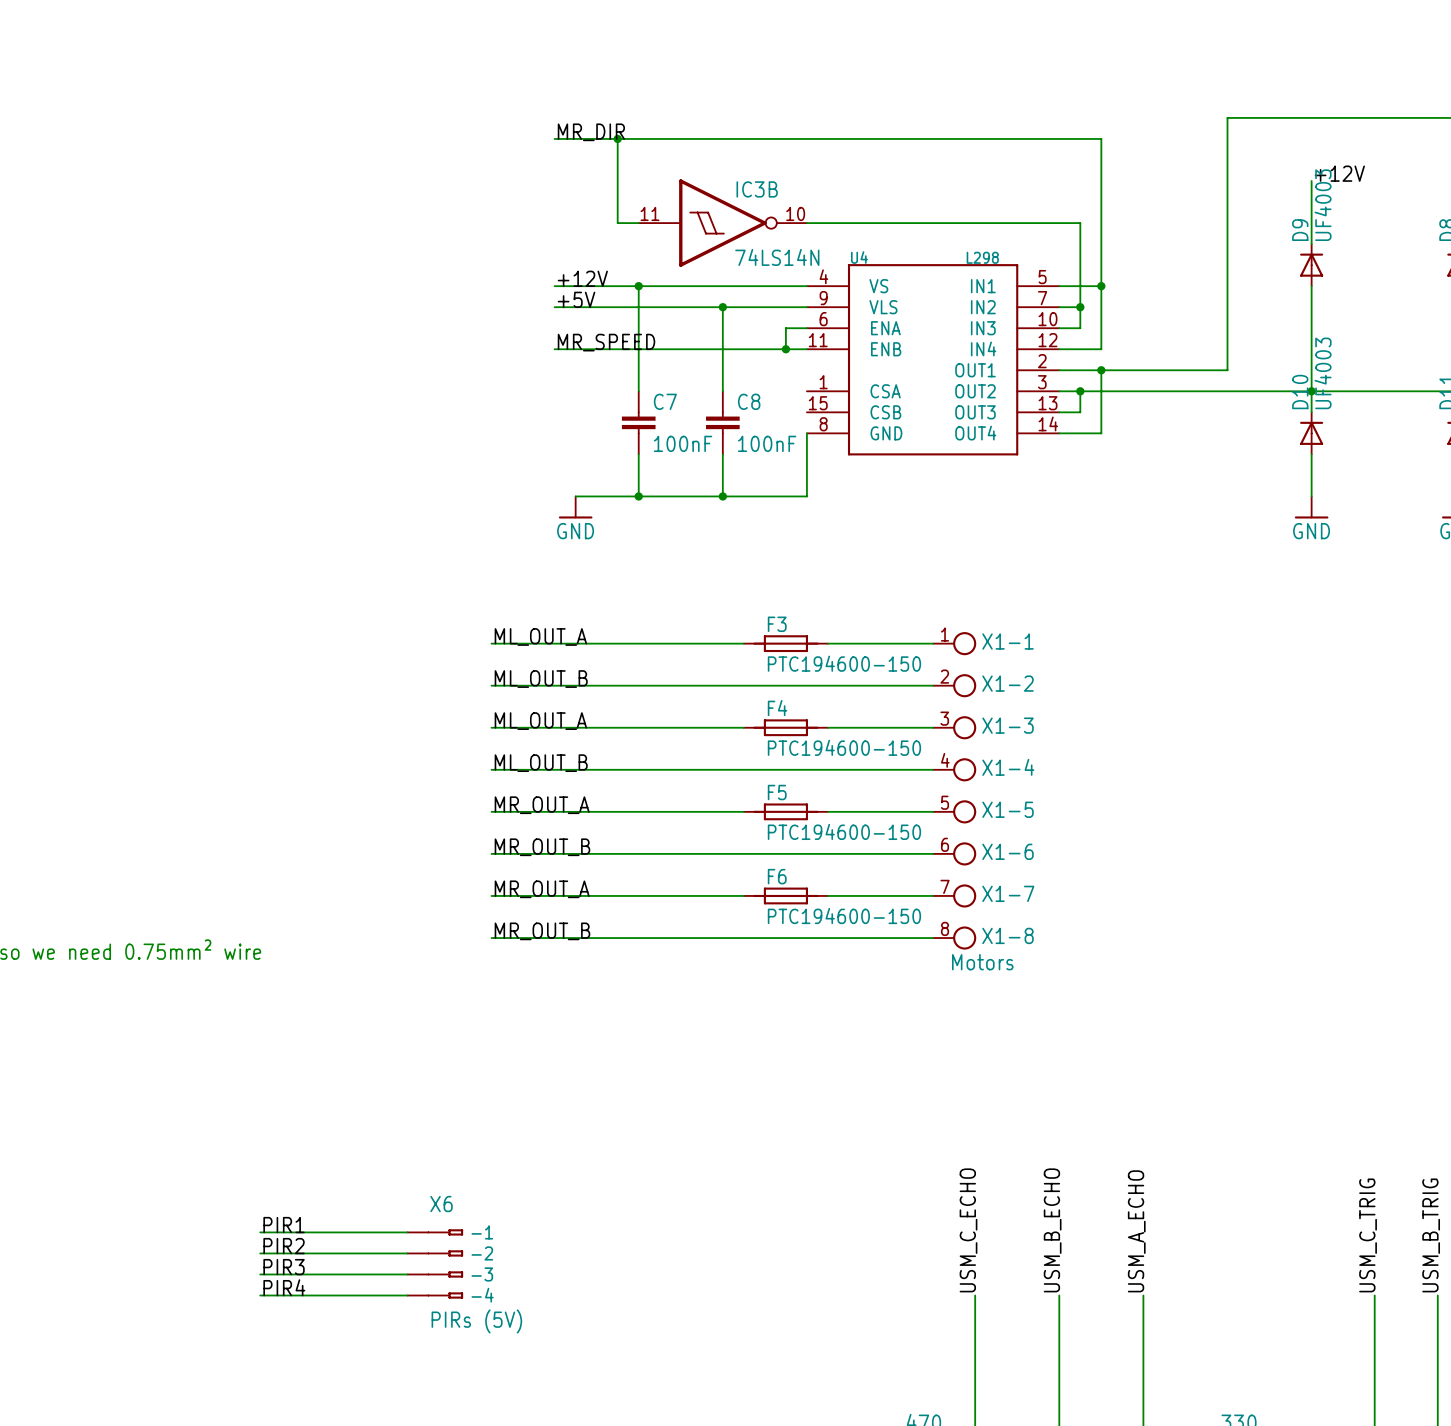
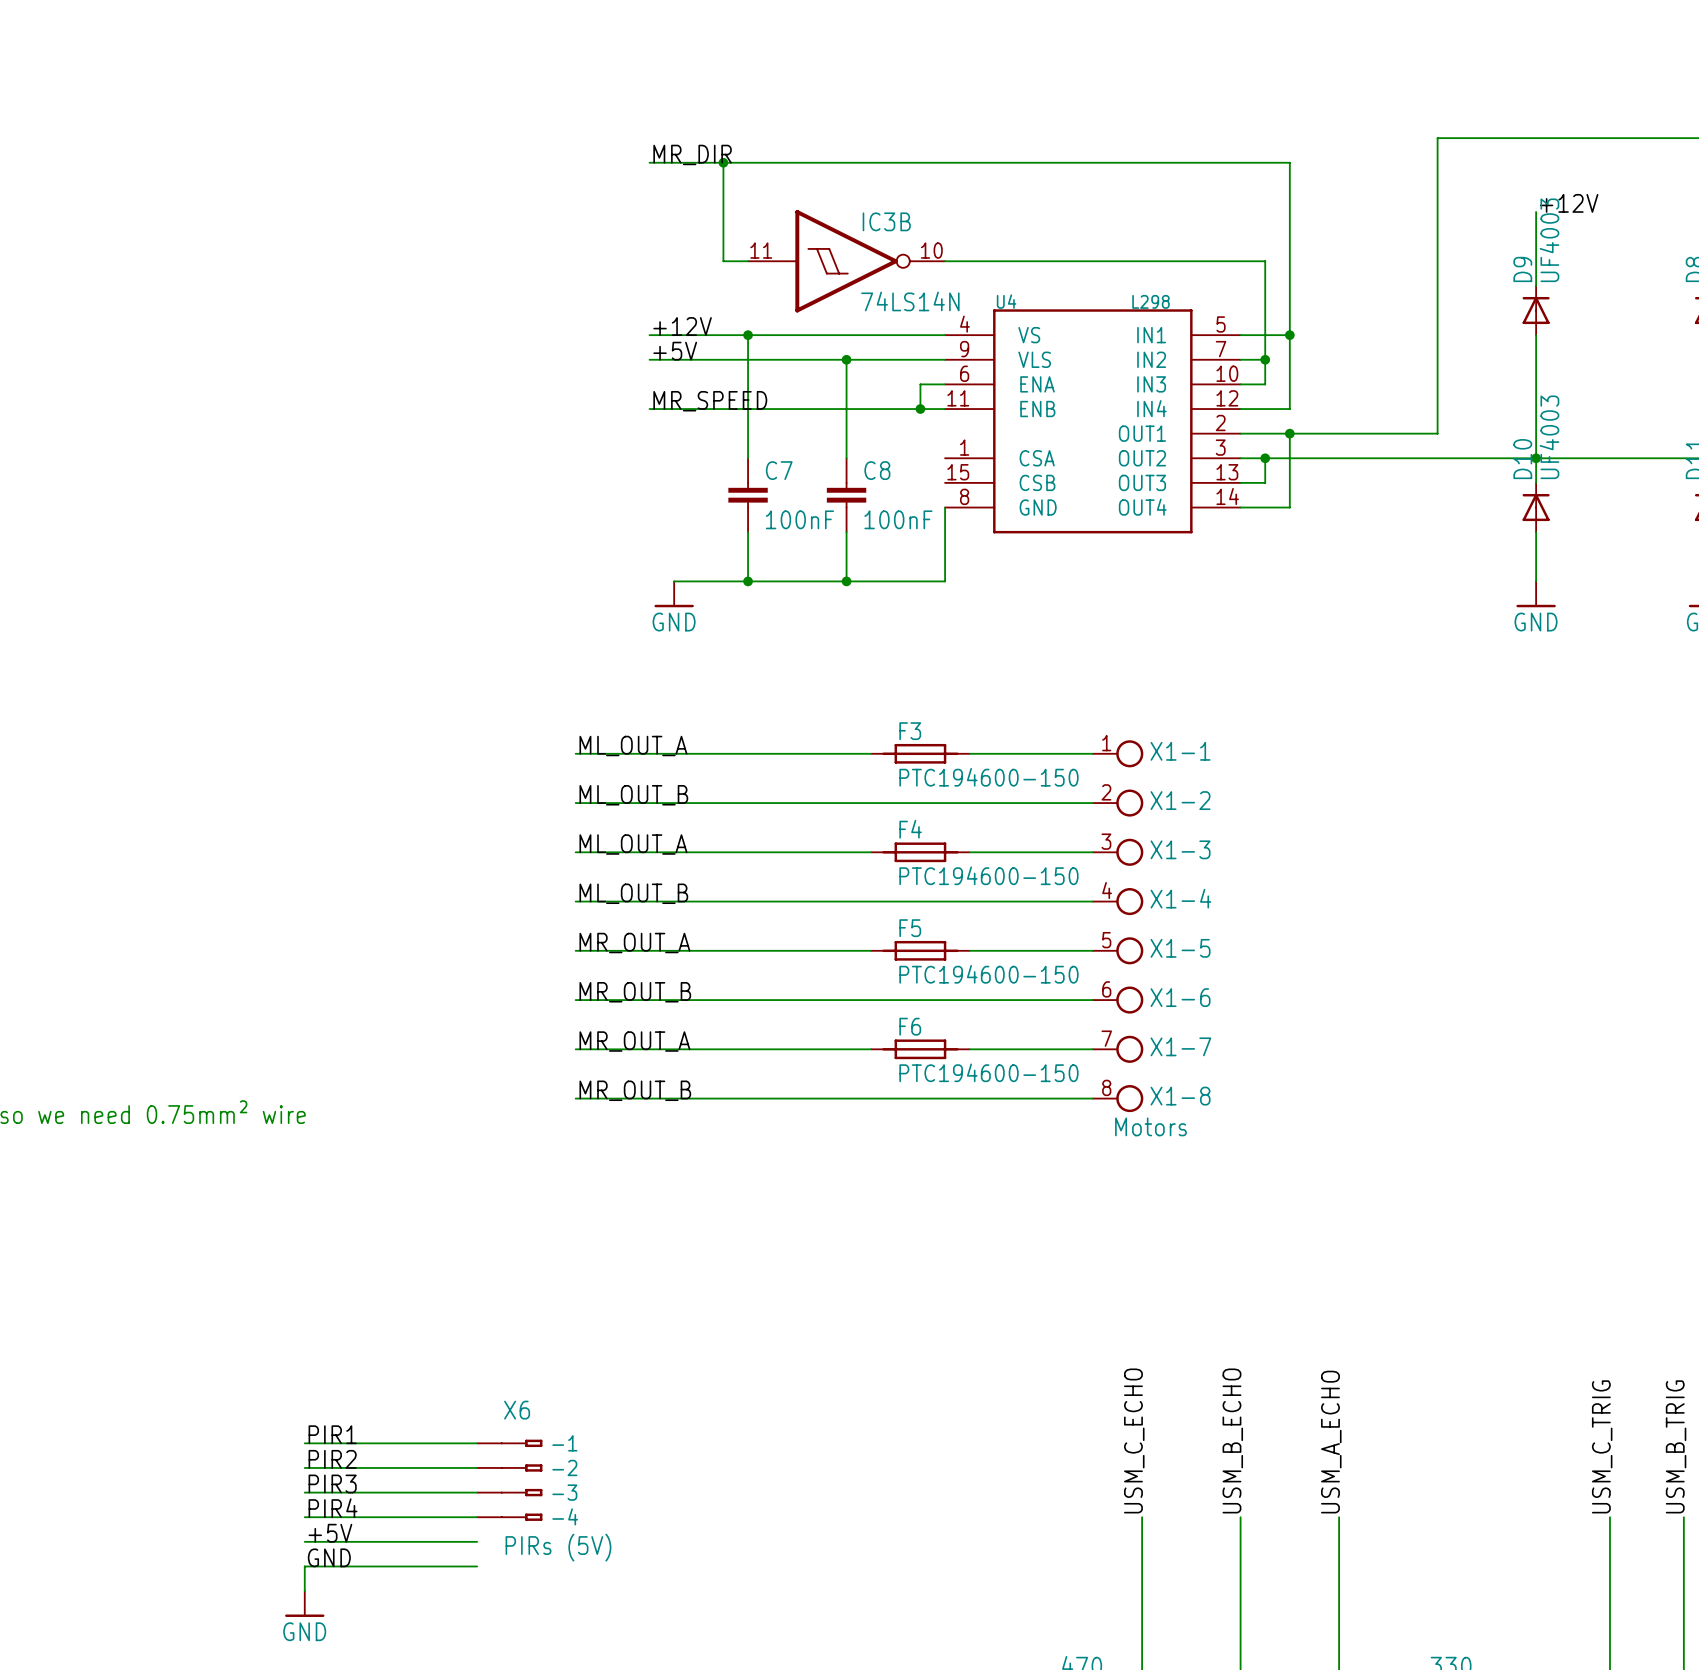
label: none -> +5V (330, 1533)
wire: none -> (304, 1541) (477, 1541)
label: none -> GND (329, 1557)
wire: none -> (477, 1566) (304, 1566) (304, 1591)
power symbol: none -> GND (304, 1604)

